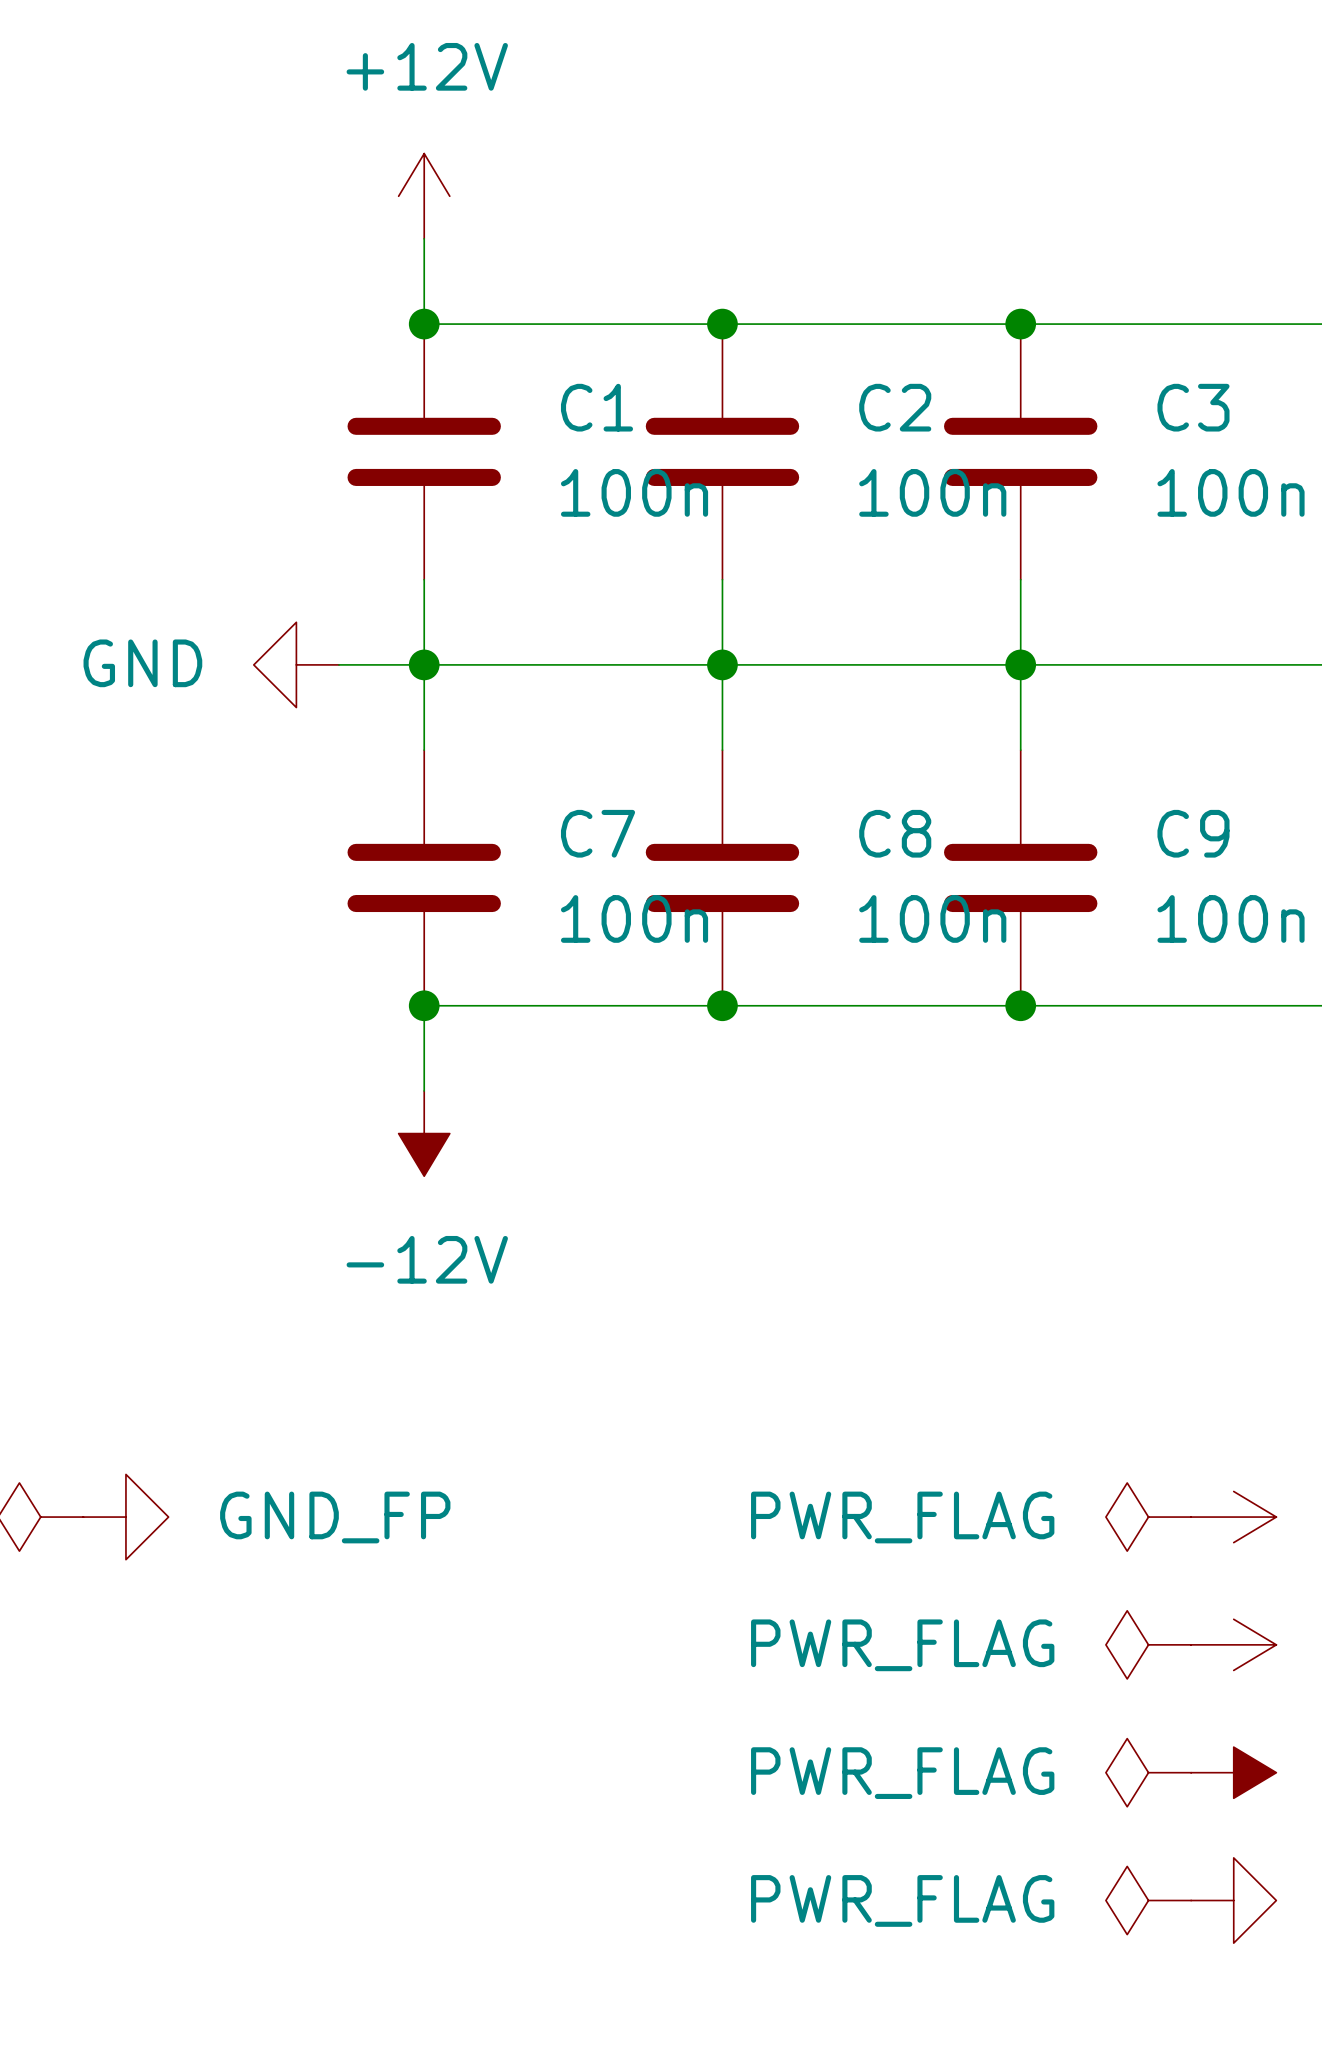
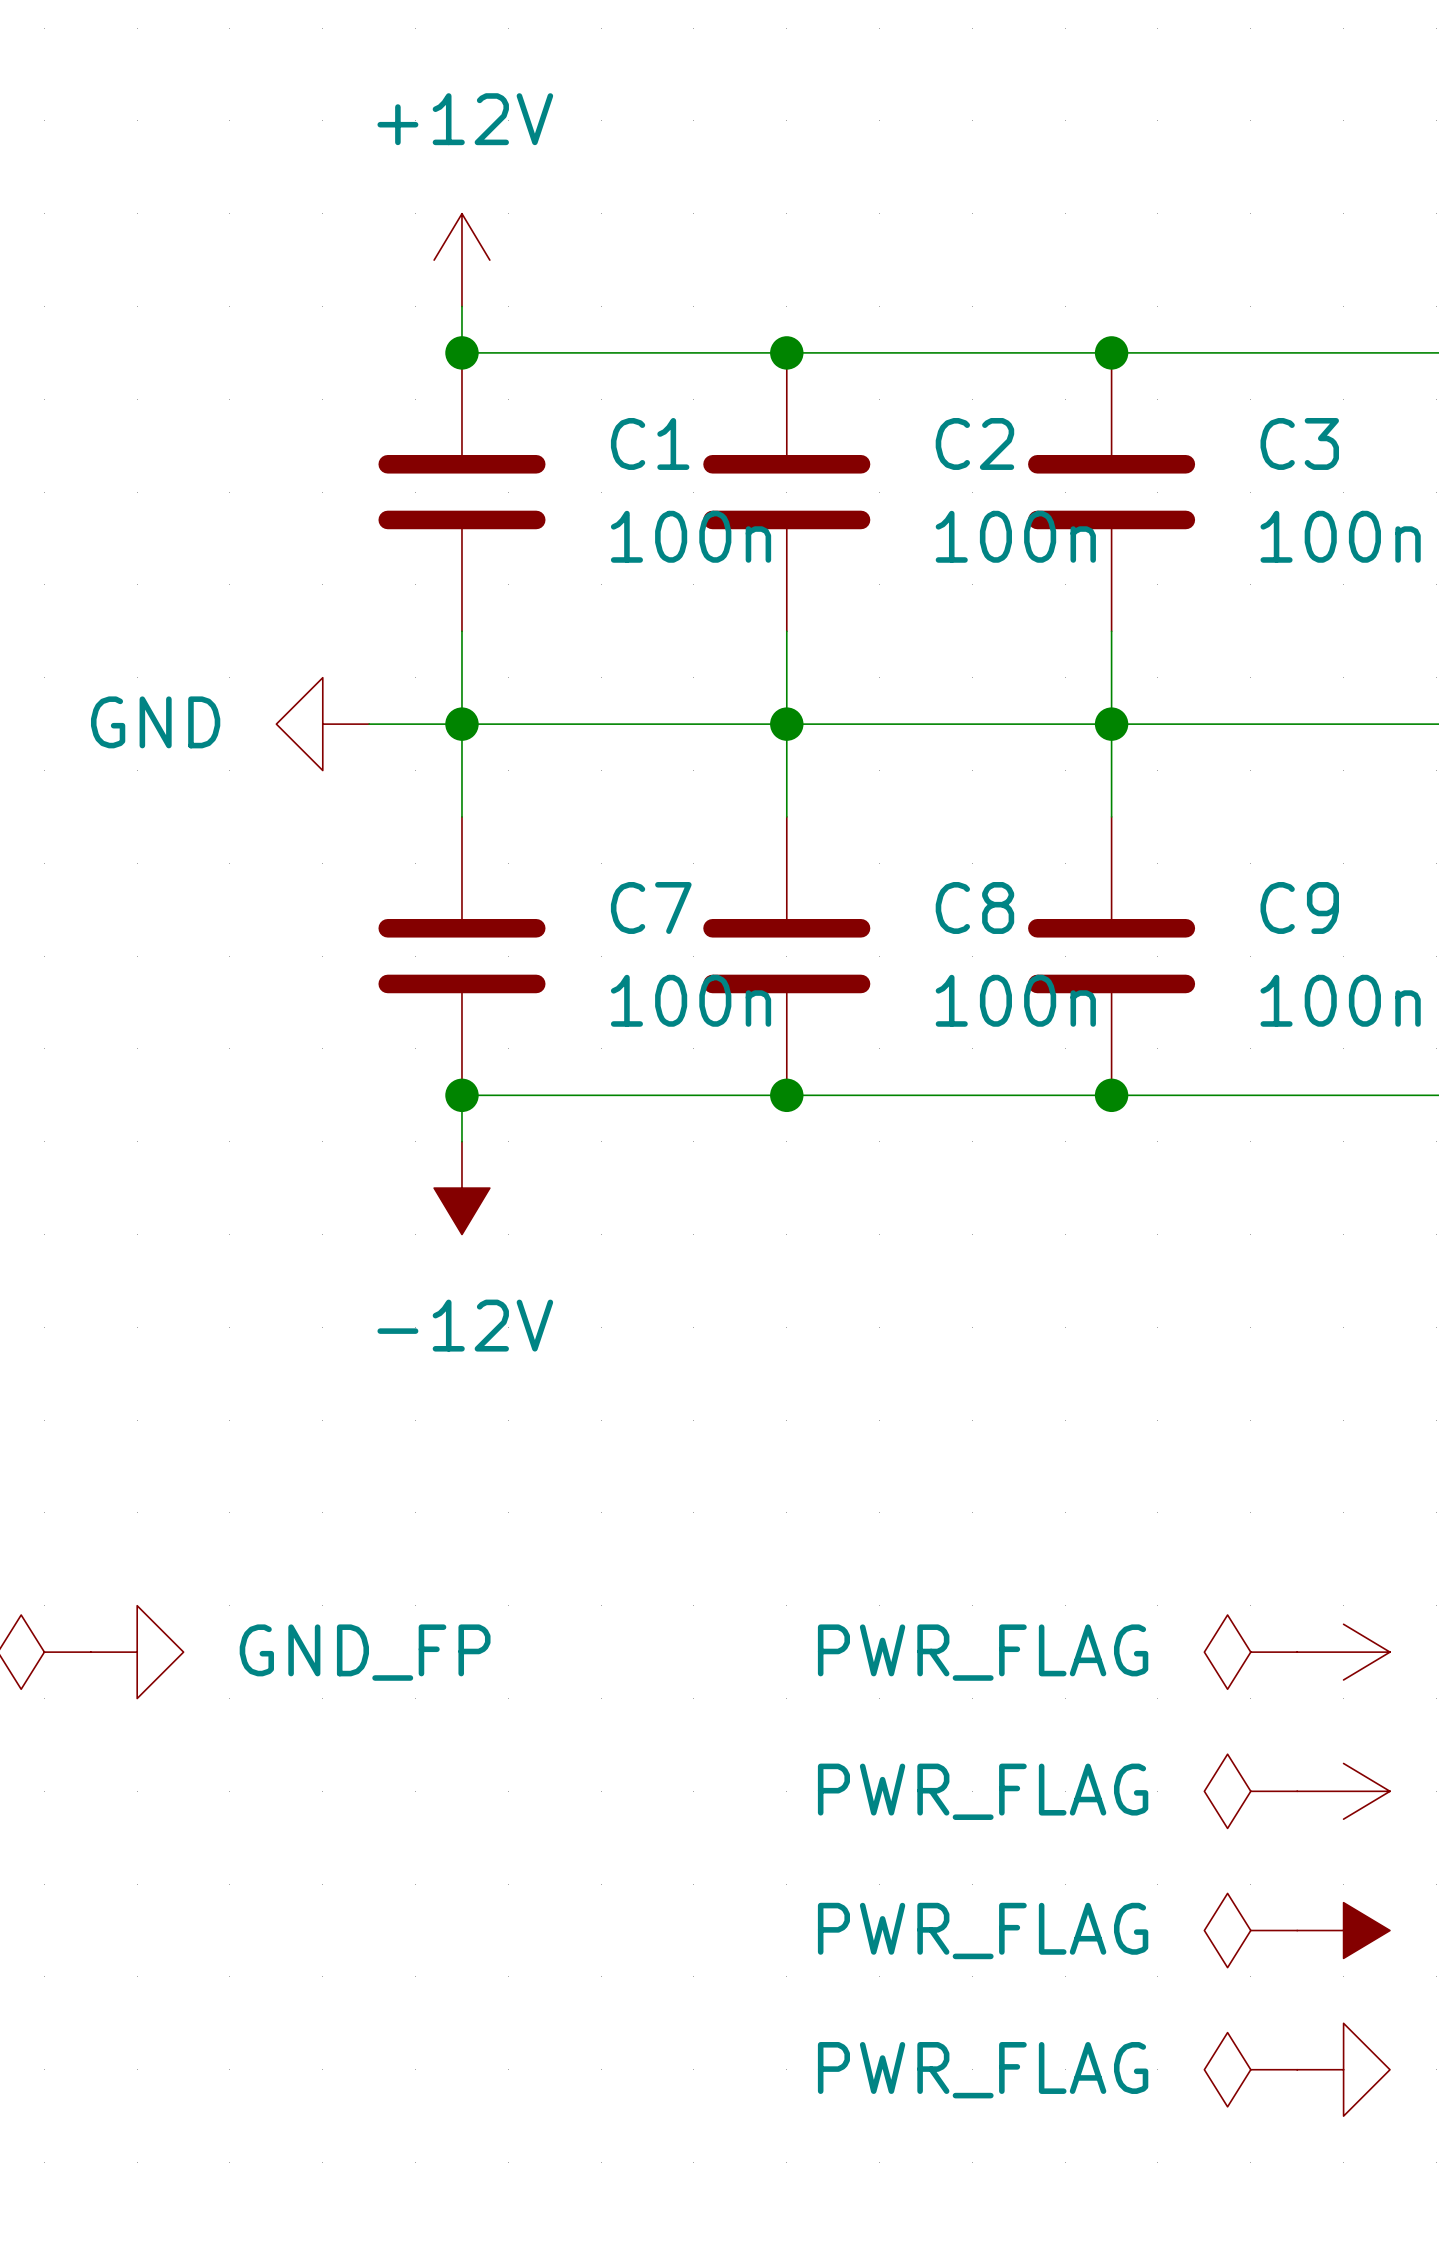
power symbol position: +12V (424, 196) -> +12V (461, 260)
power symbol position: -12V (424, 1133) -> -12V (461, 1188)

